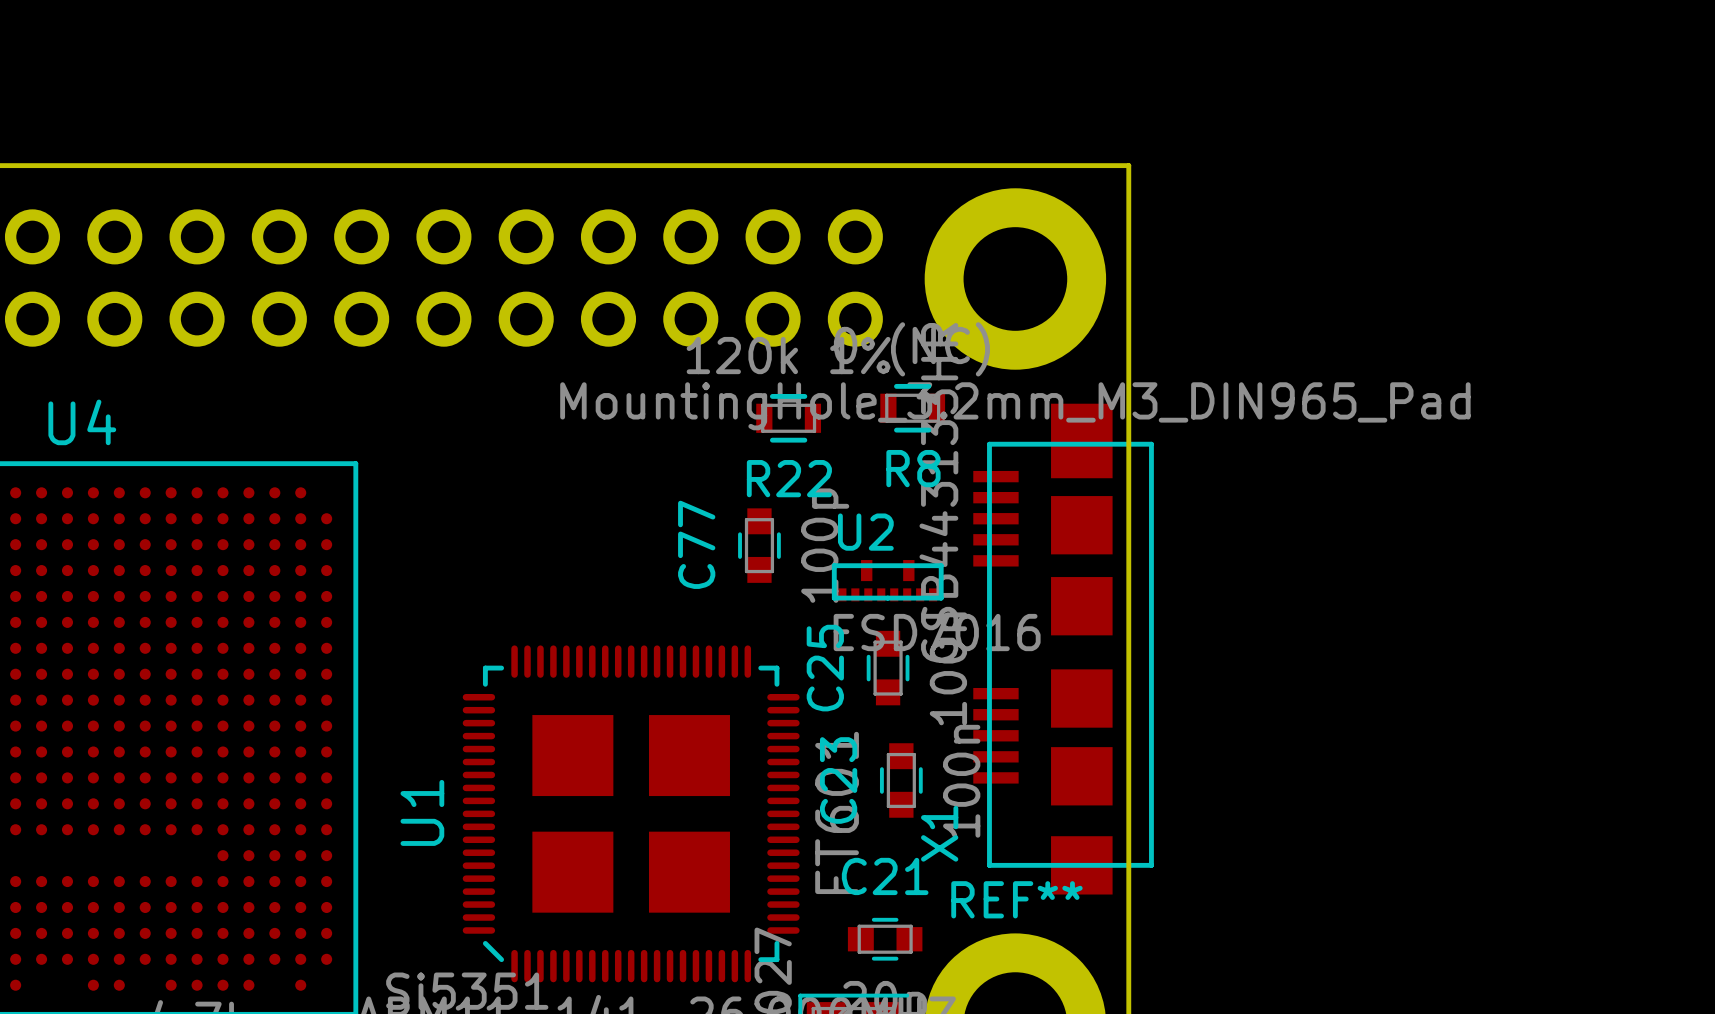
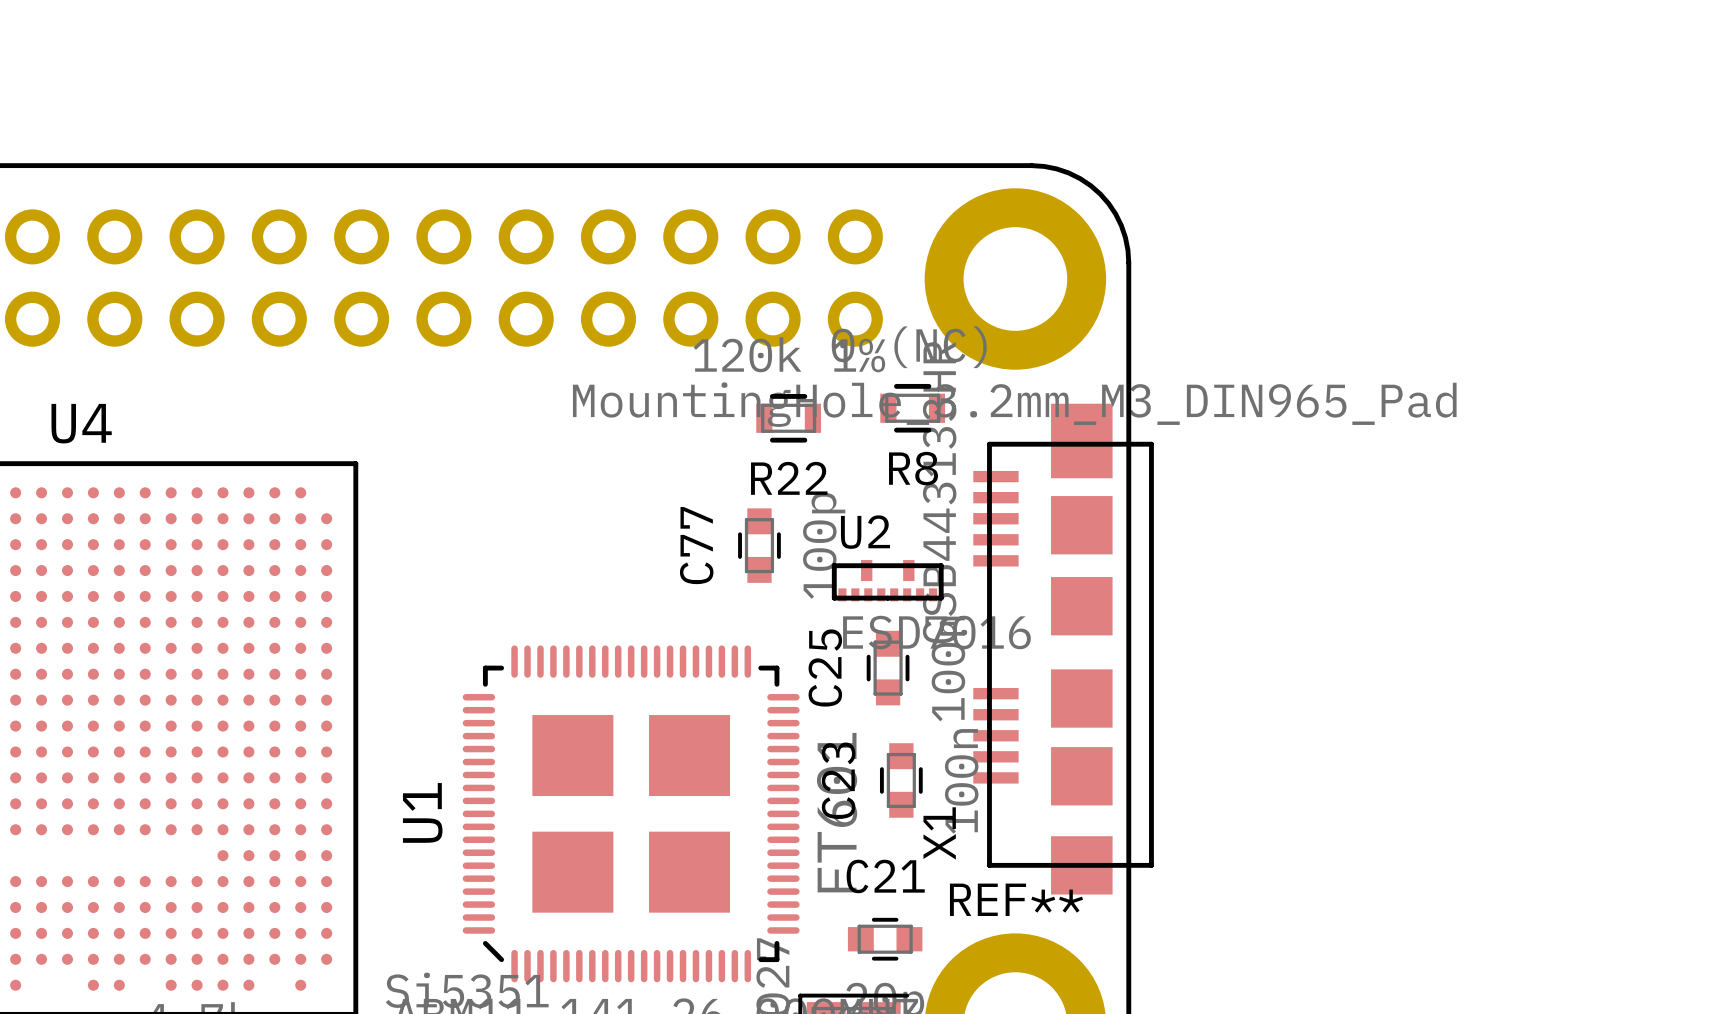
board edge: (1031, 165) (1128, 165) (1128, 262) -> (1031, 165) (1044, 166) (1068, 173) (1090, 185) (1100, 194) (1108, 203) (1121, 225) (1127, 250) (1128, 262)

